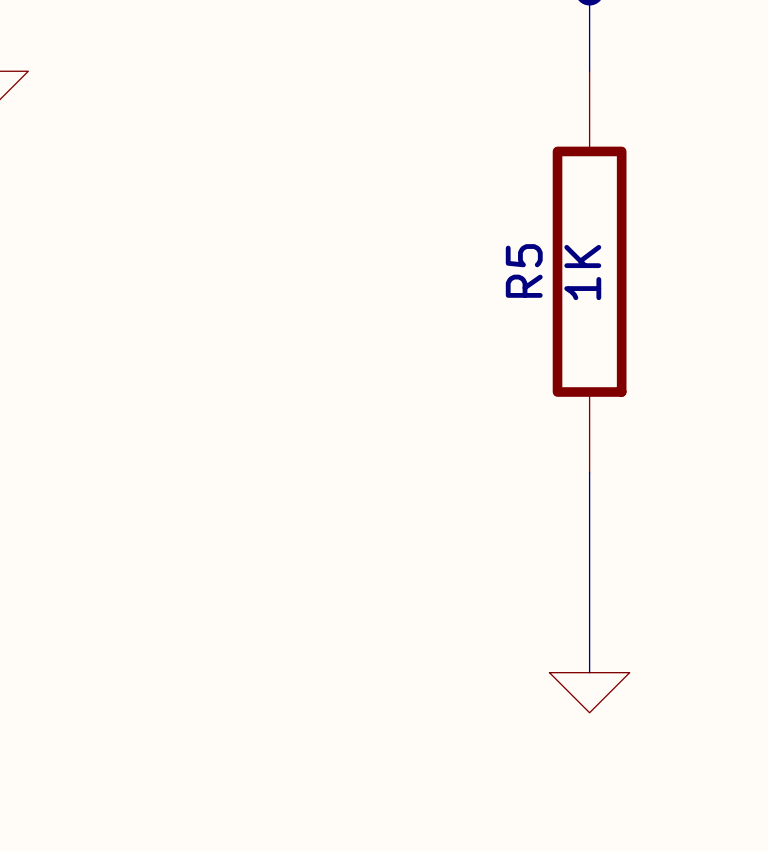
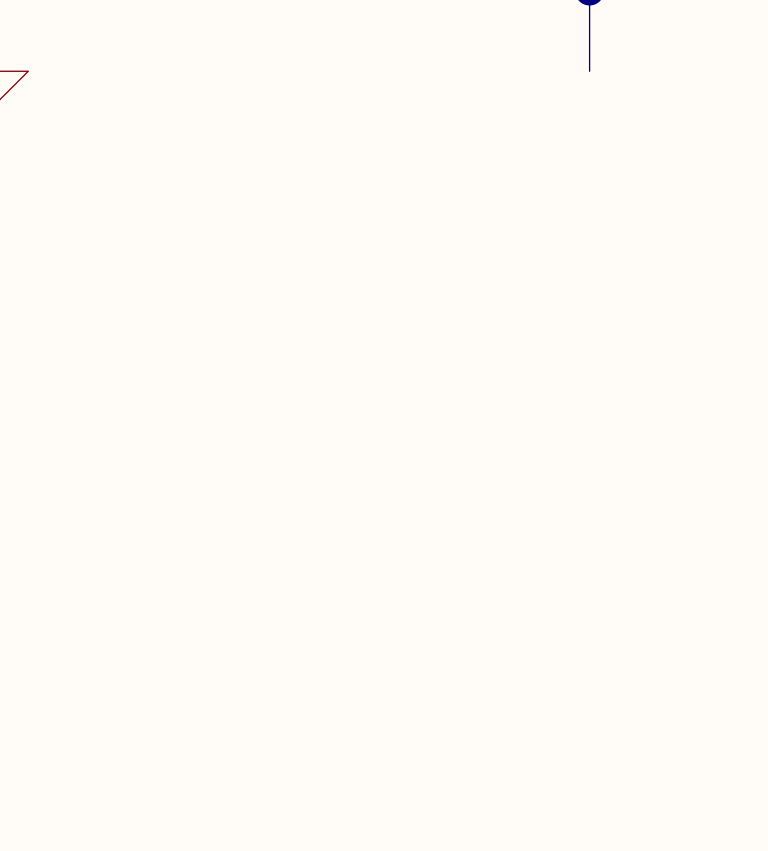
R5: 1K (589, 271) -> none
wire: (589, 472) (589, 672) -> none
power symbol: (589, 692) -> none

